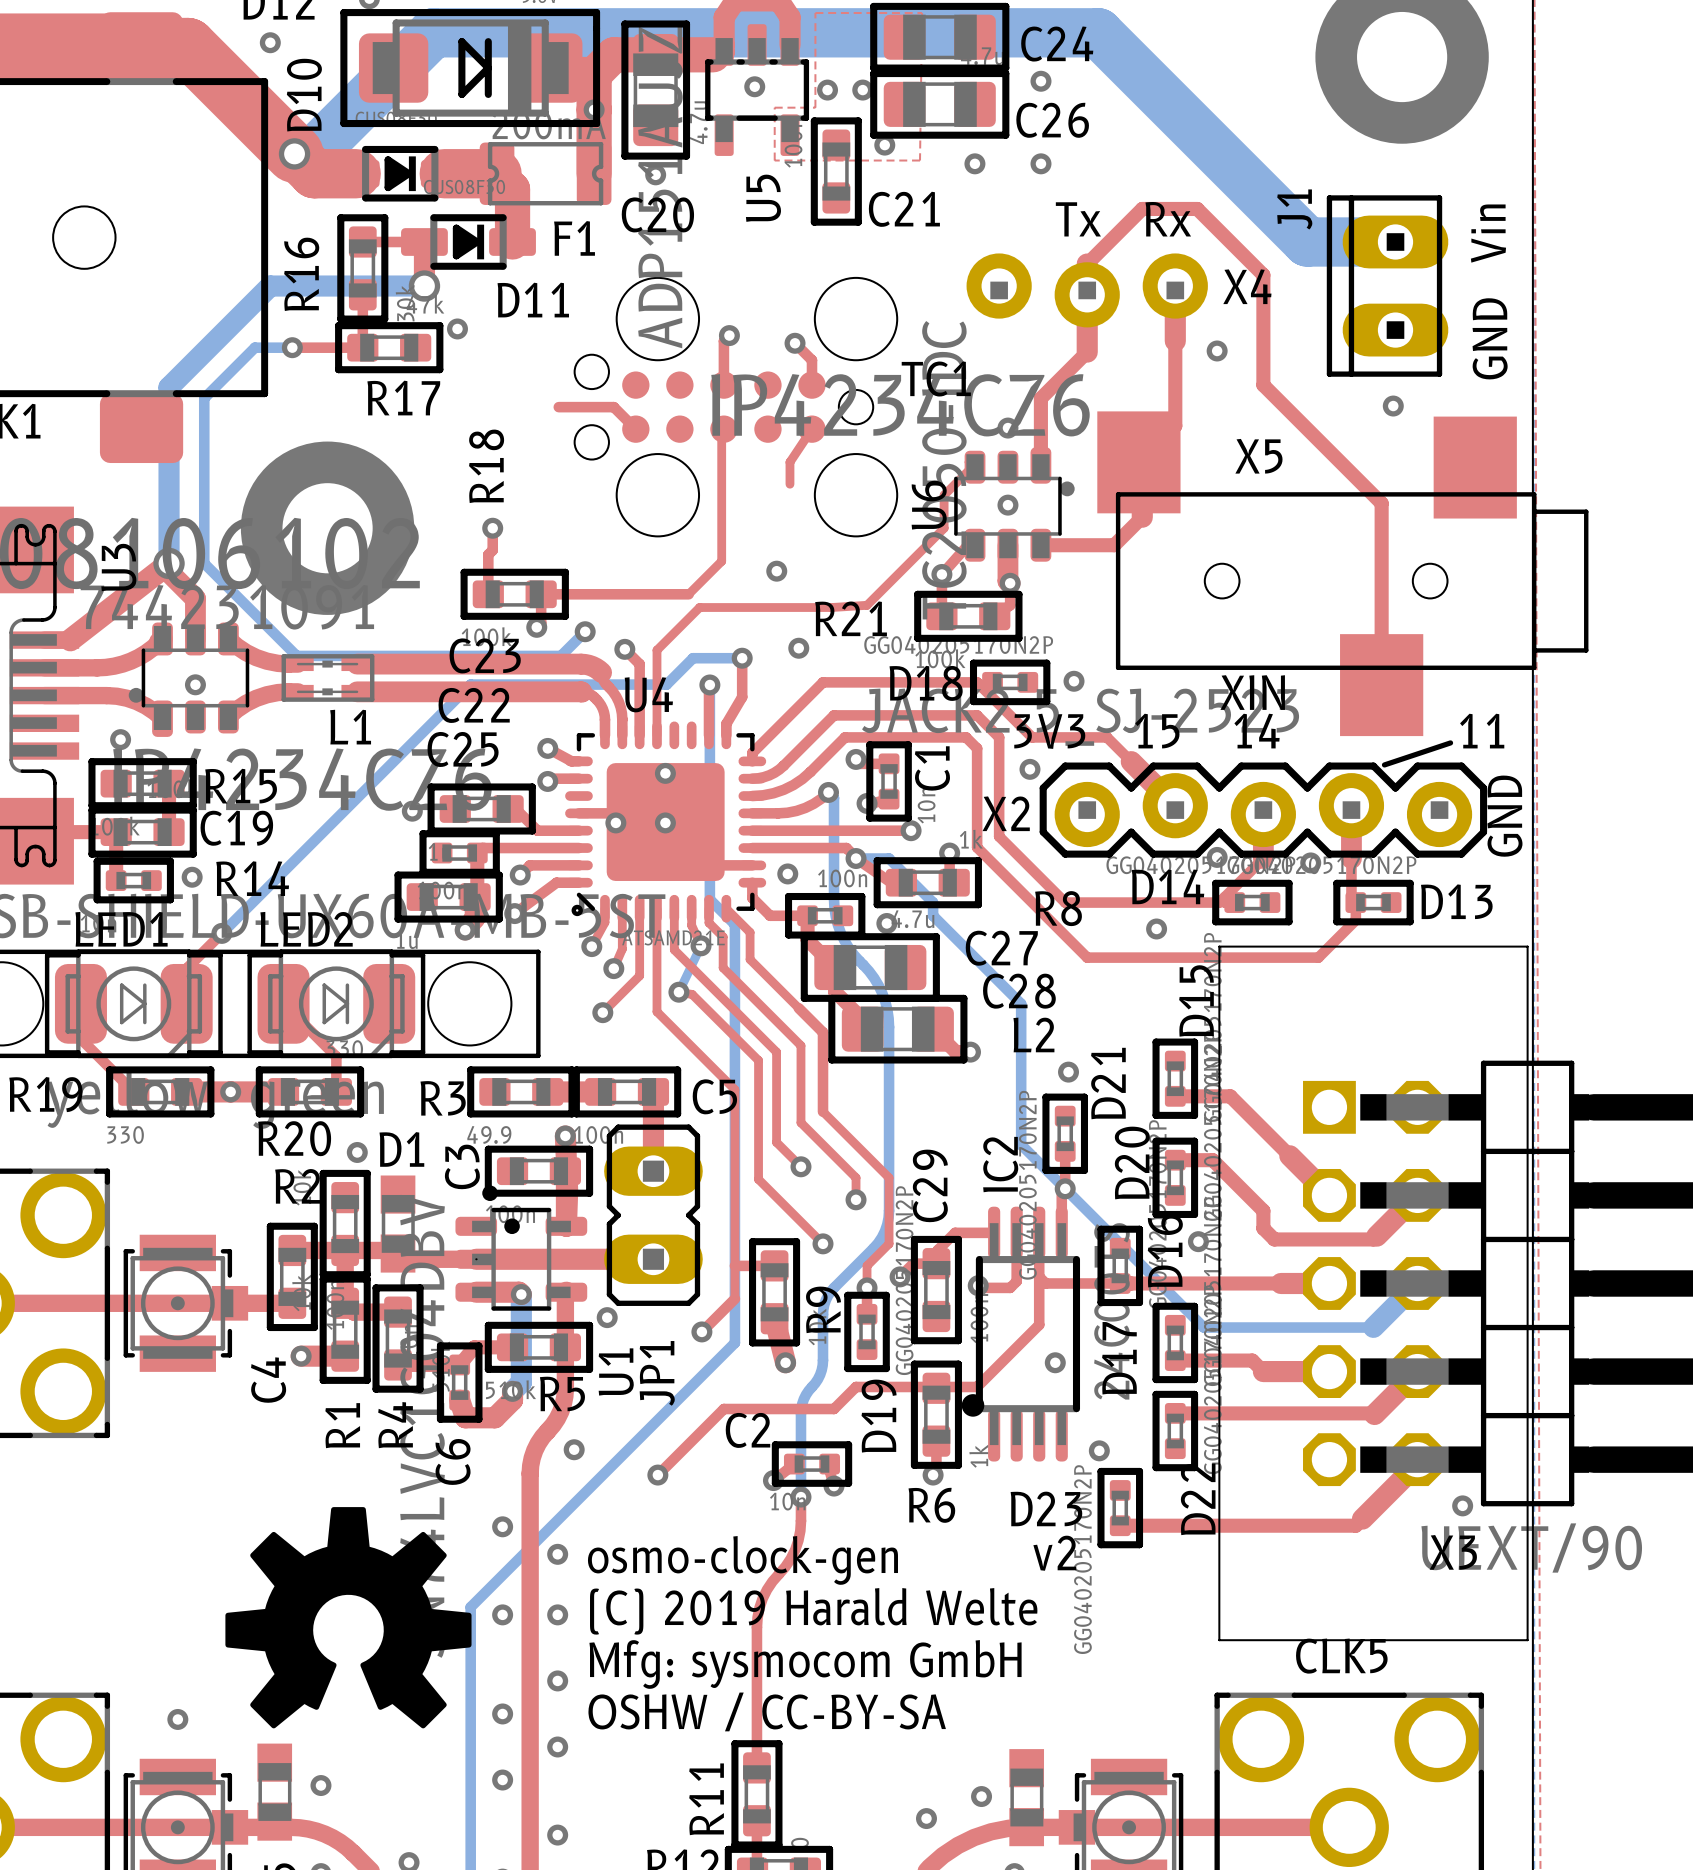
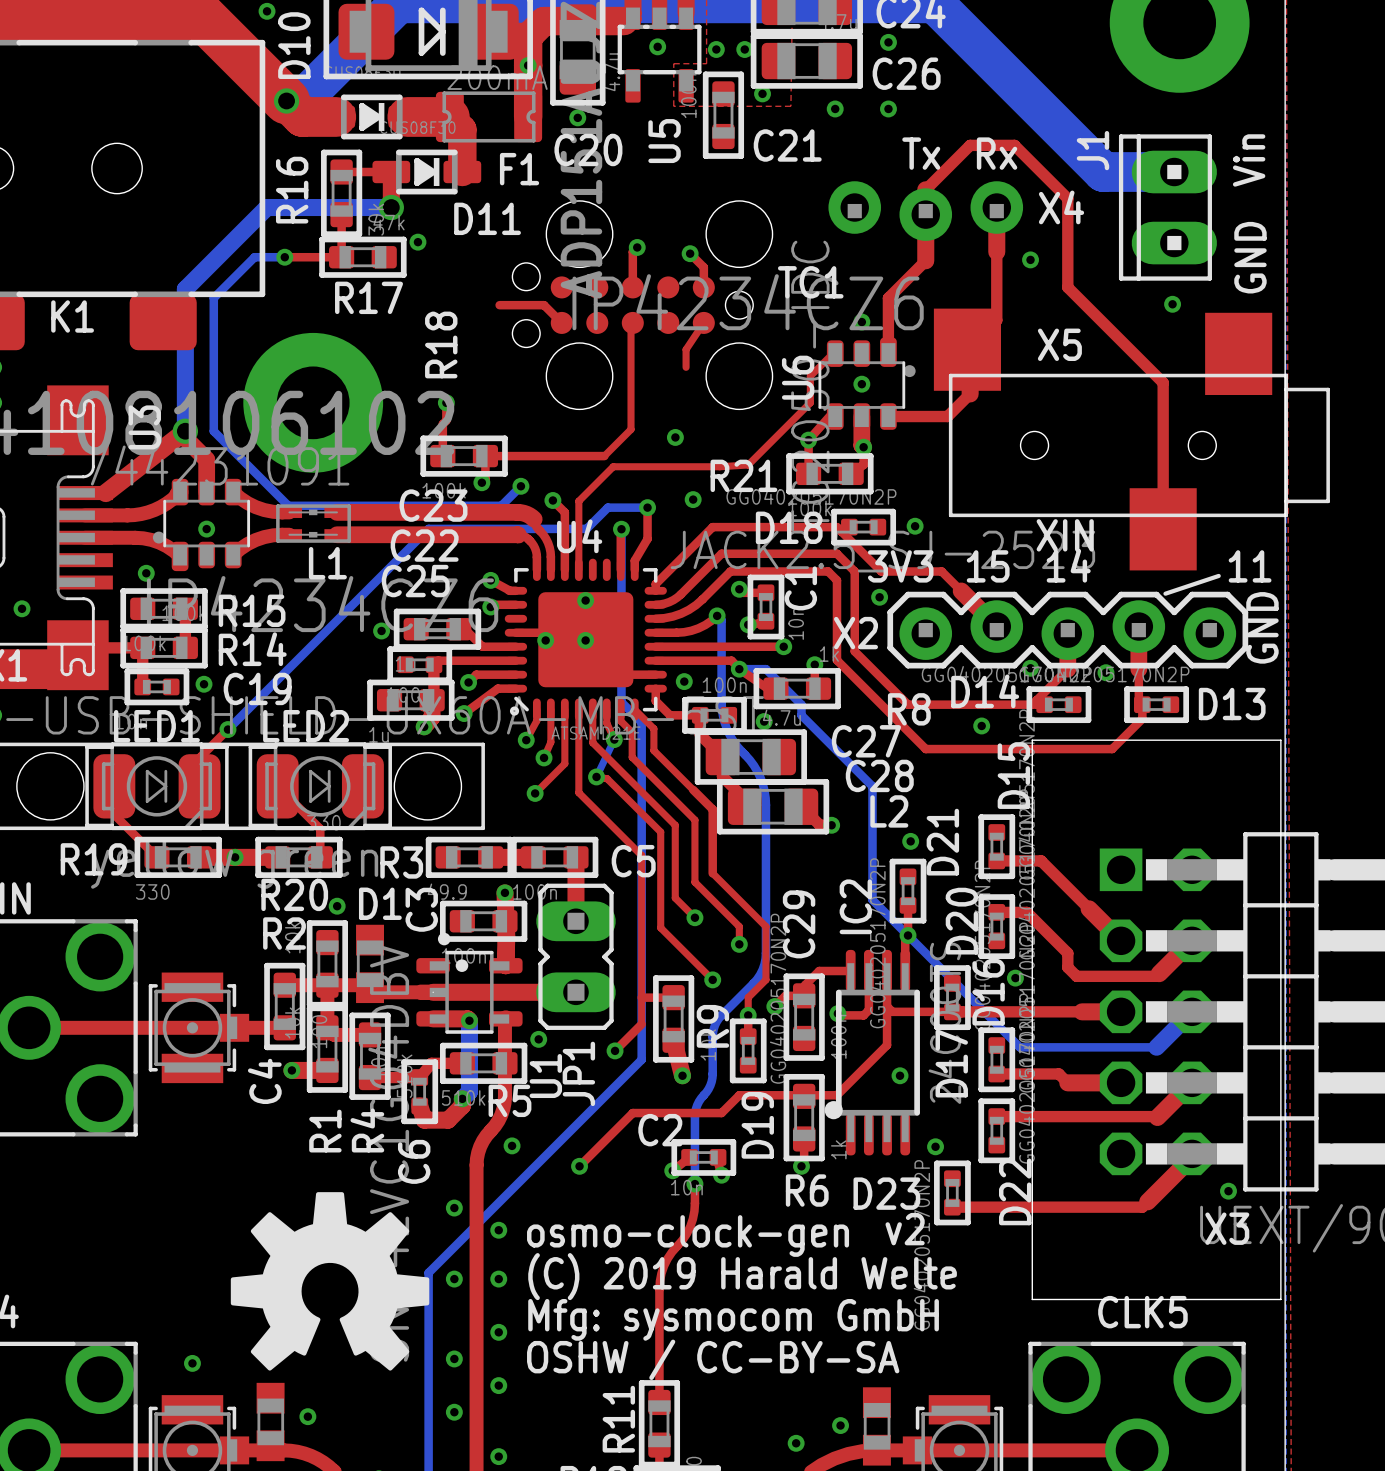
C19 name position: C19 (236, 828) -> C19 (257, 688)
R14 name position: R14 (252, 878) -> R14 (252, 649)

